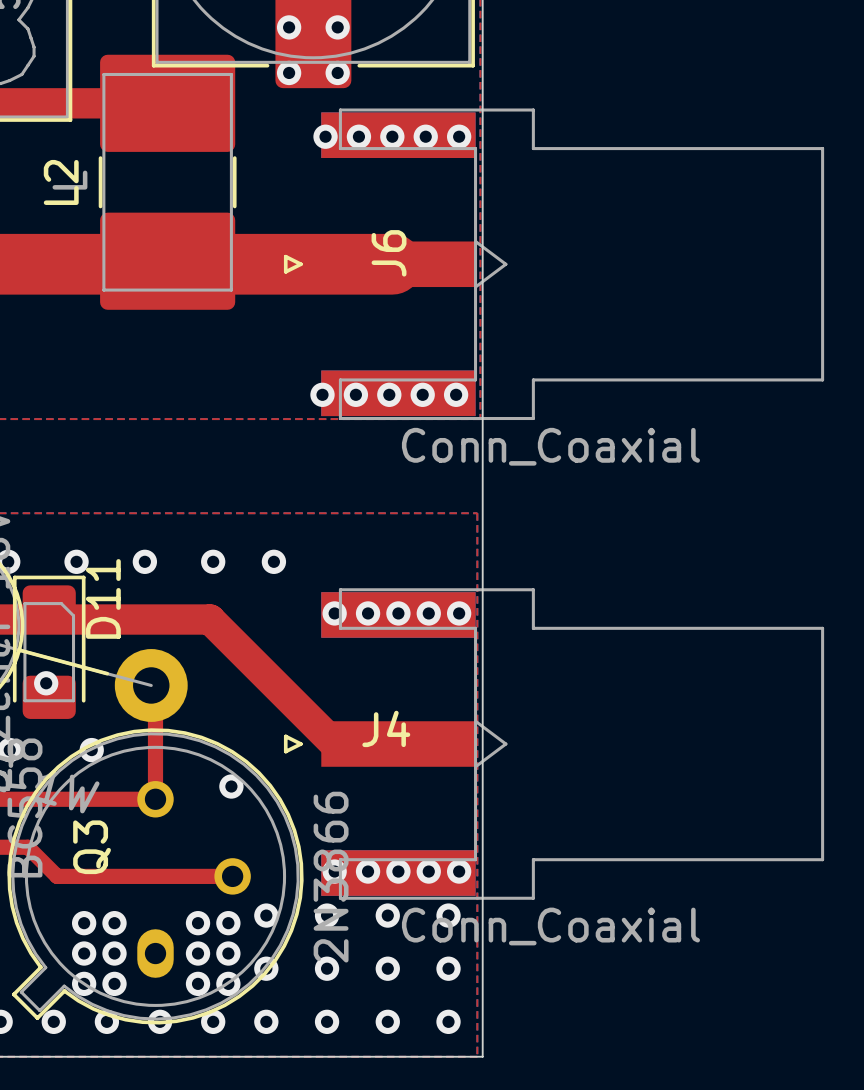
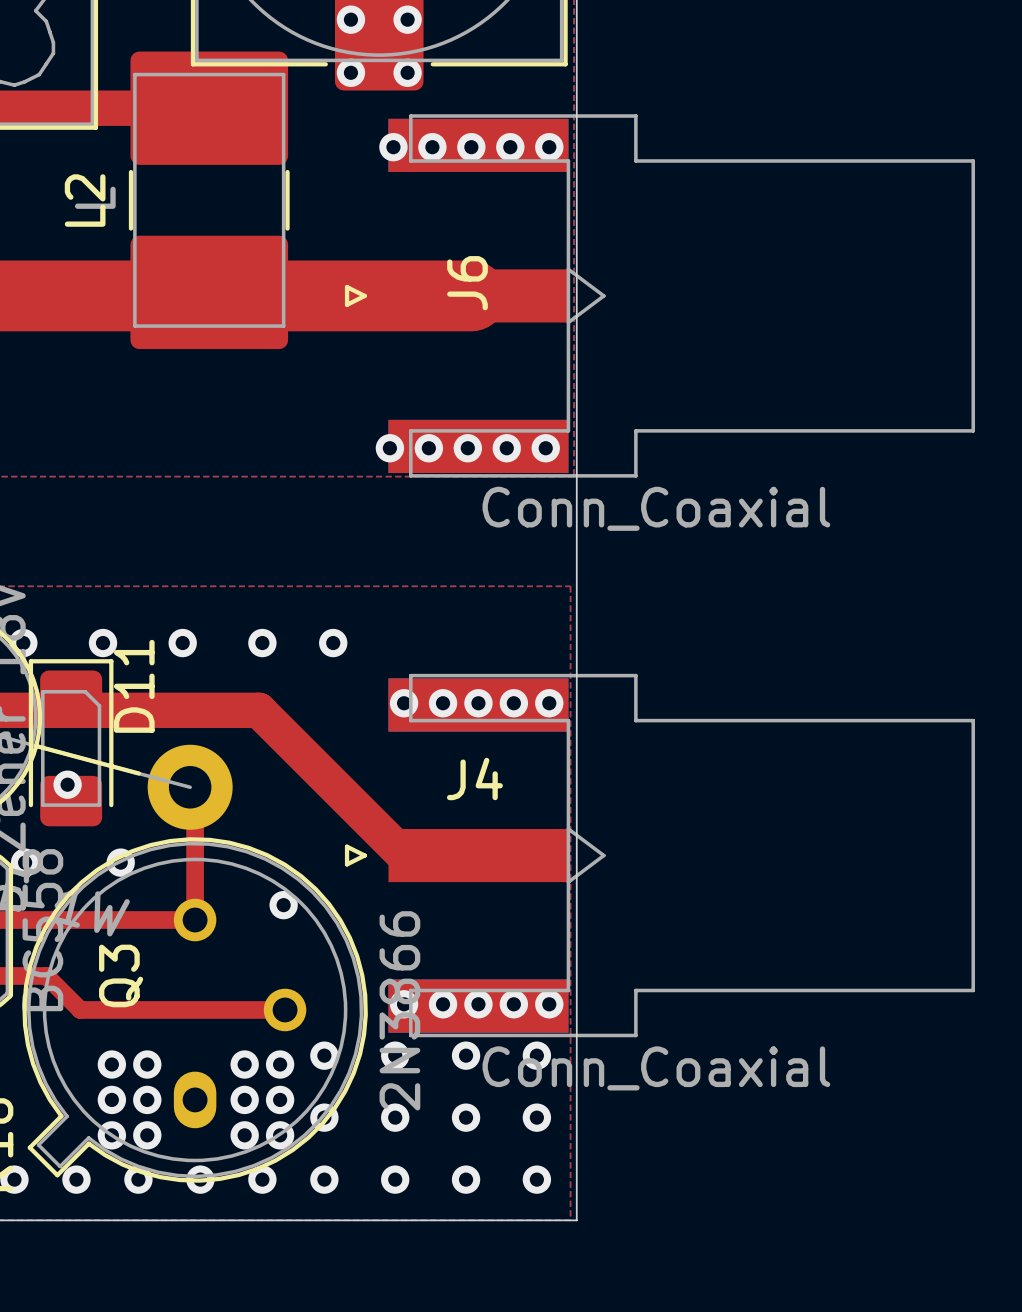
J4 name position: J4 (386, 728) -> J4 (474, 779)

